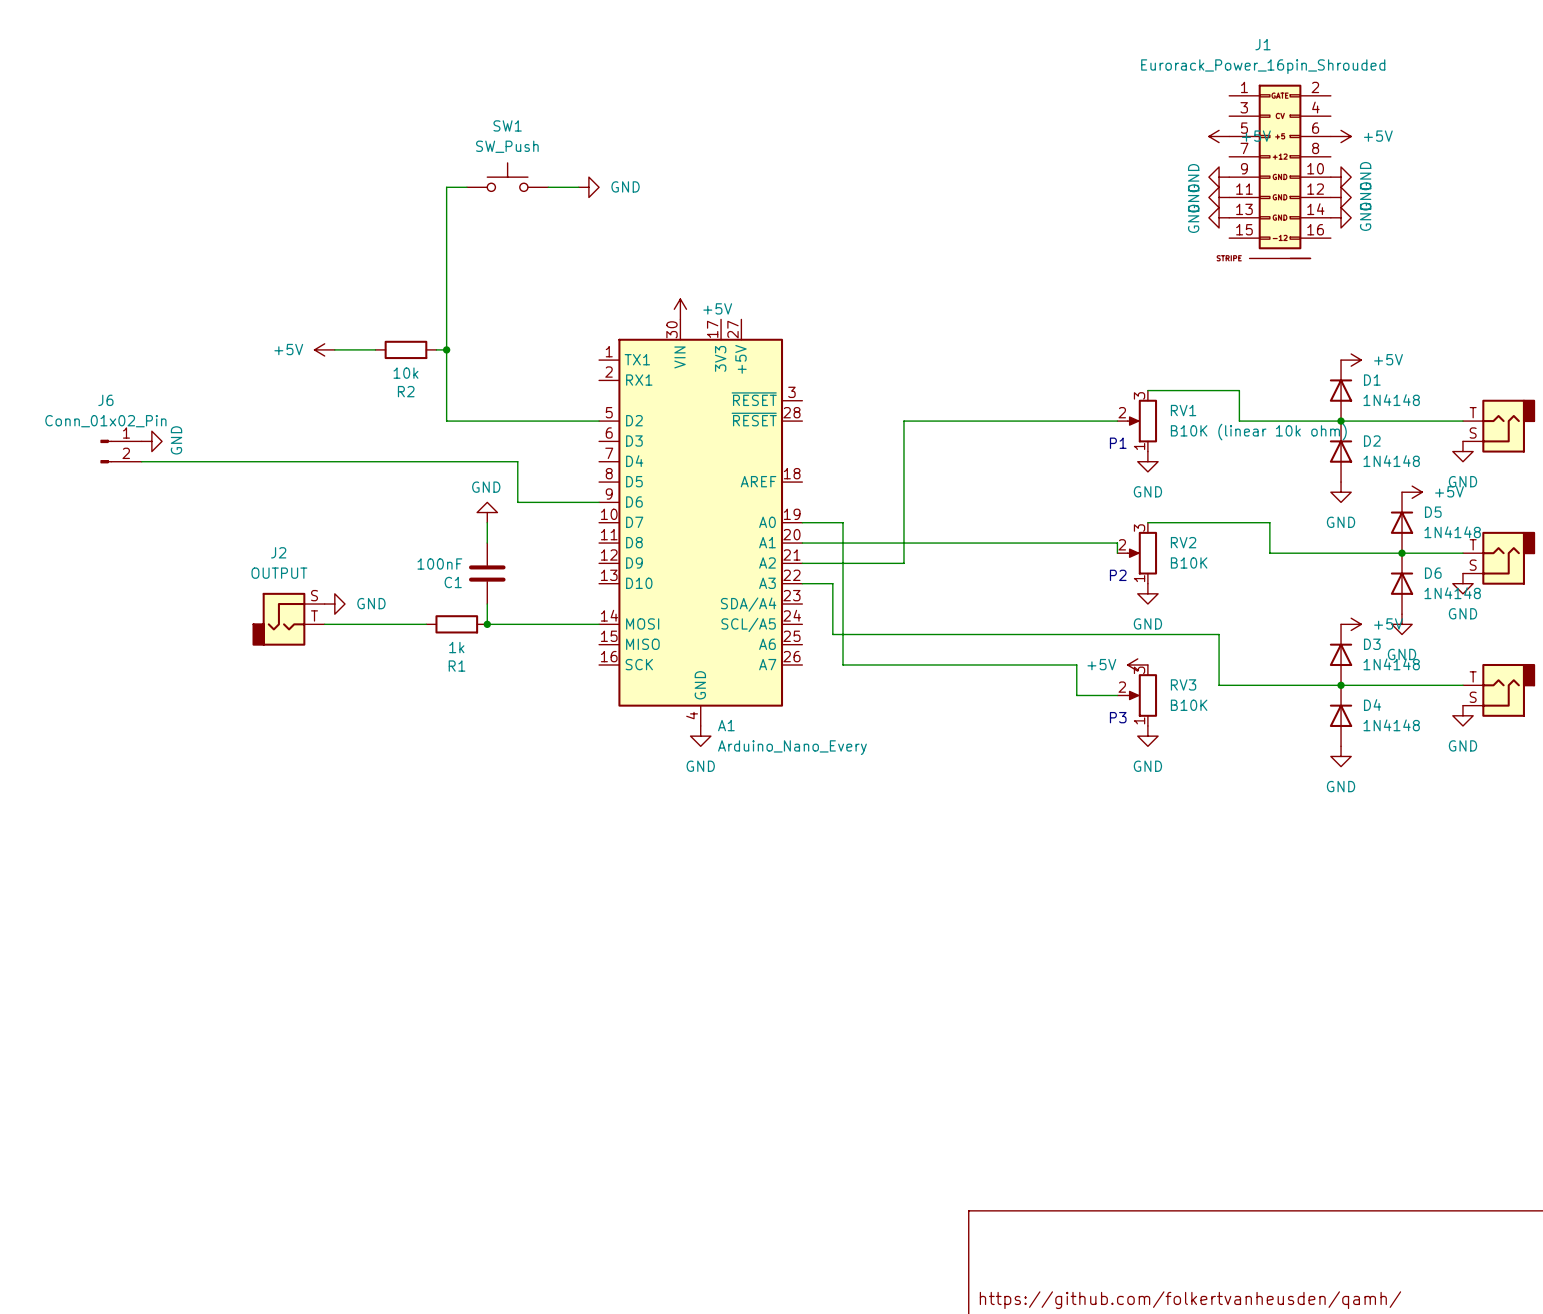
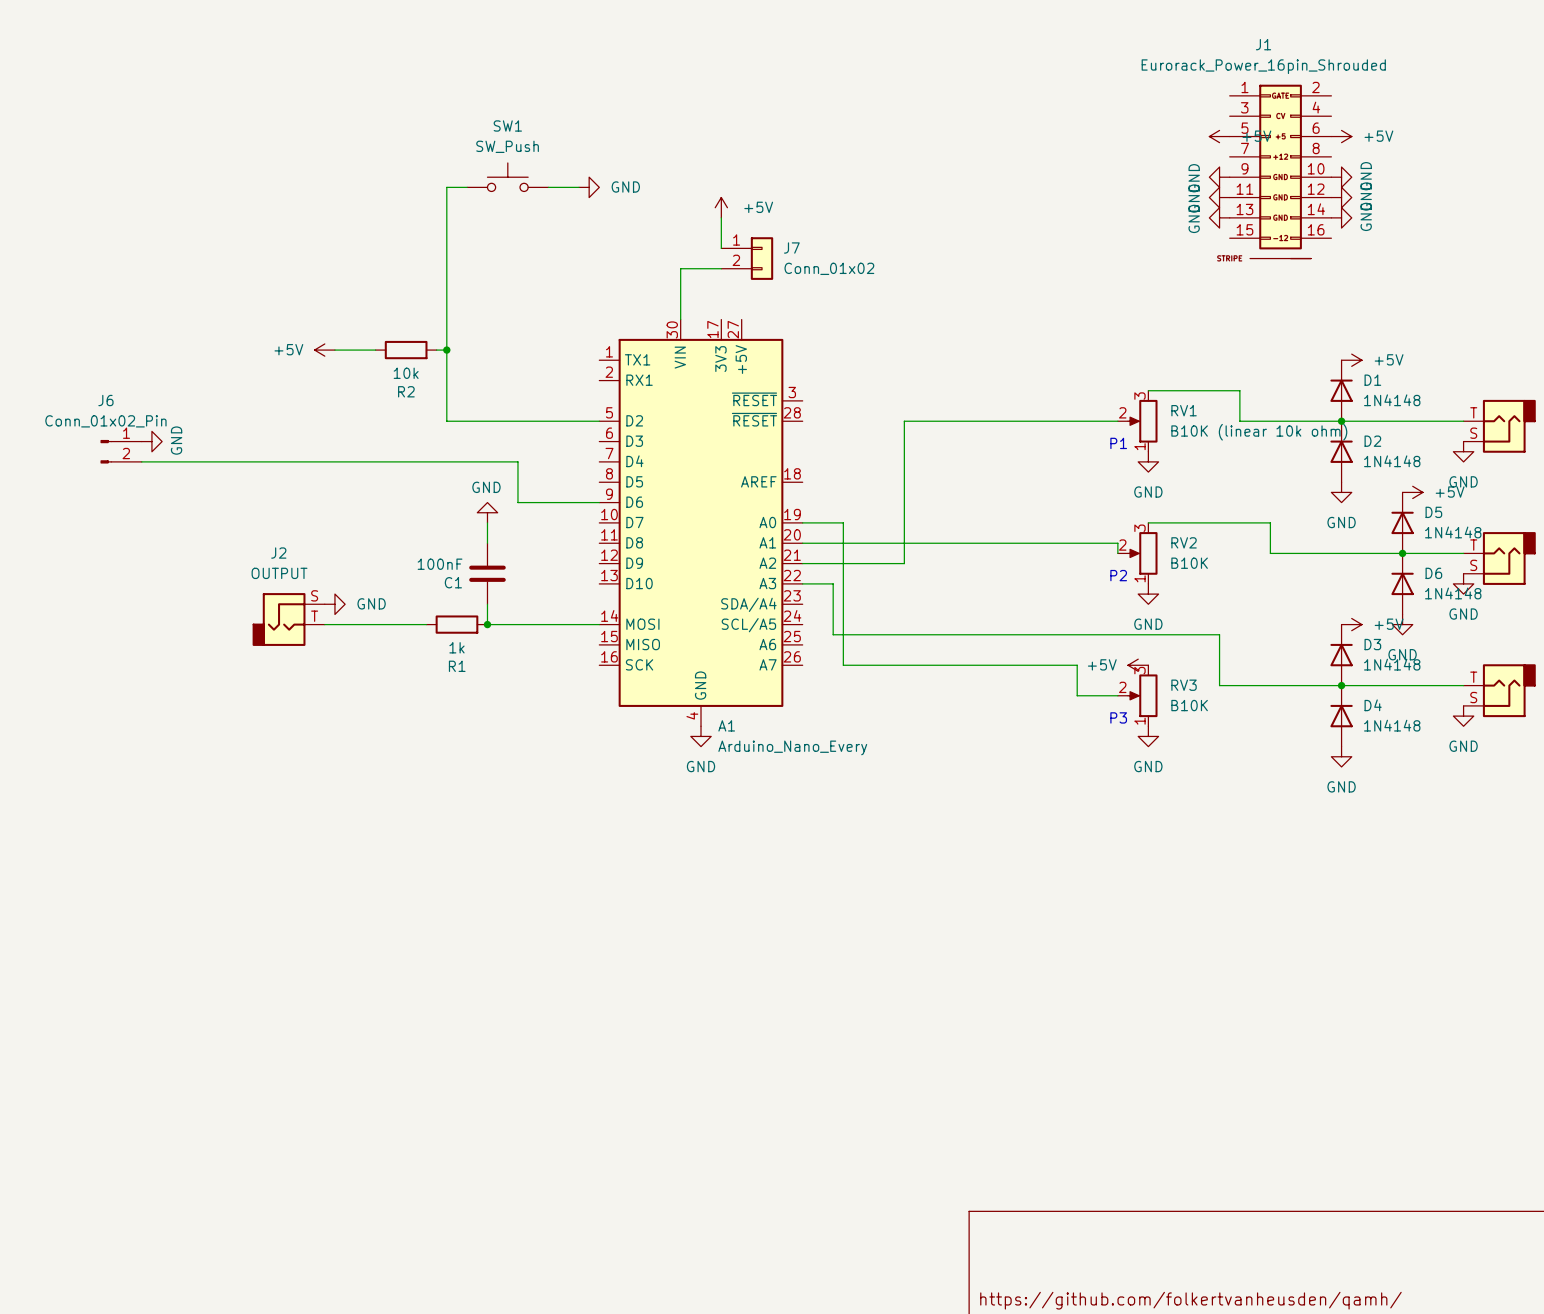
wire: none -> (721, 217) (721, 248)
J7: none -> Conn_01x02 (747, 258)
wire: none -> (721, 268) (680, 268) (680, 319)
power symbol position: +5V (680, 309) -> +5V (721, 207)

